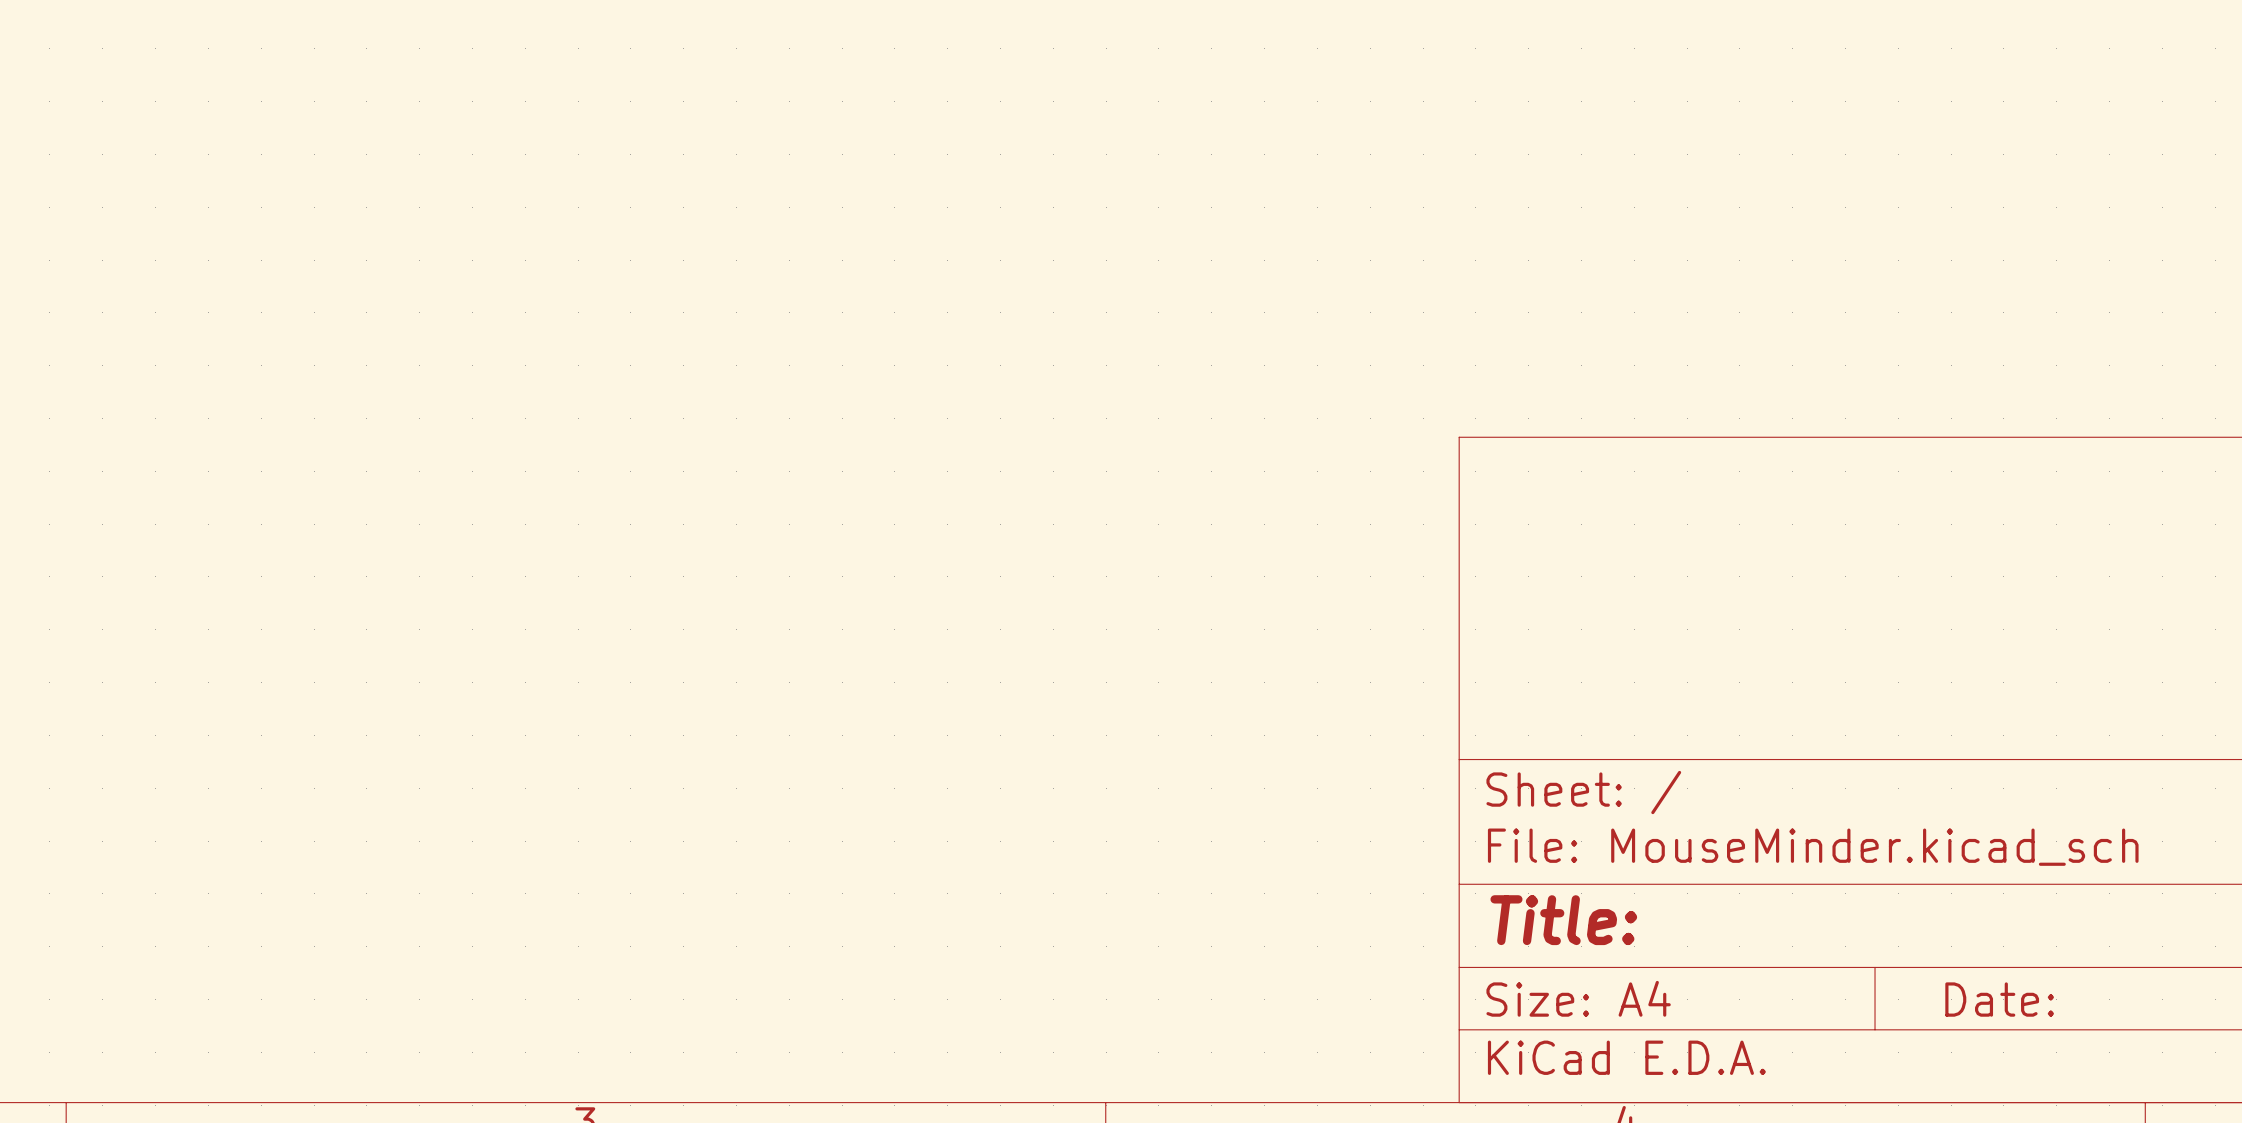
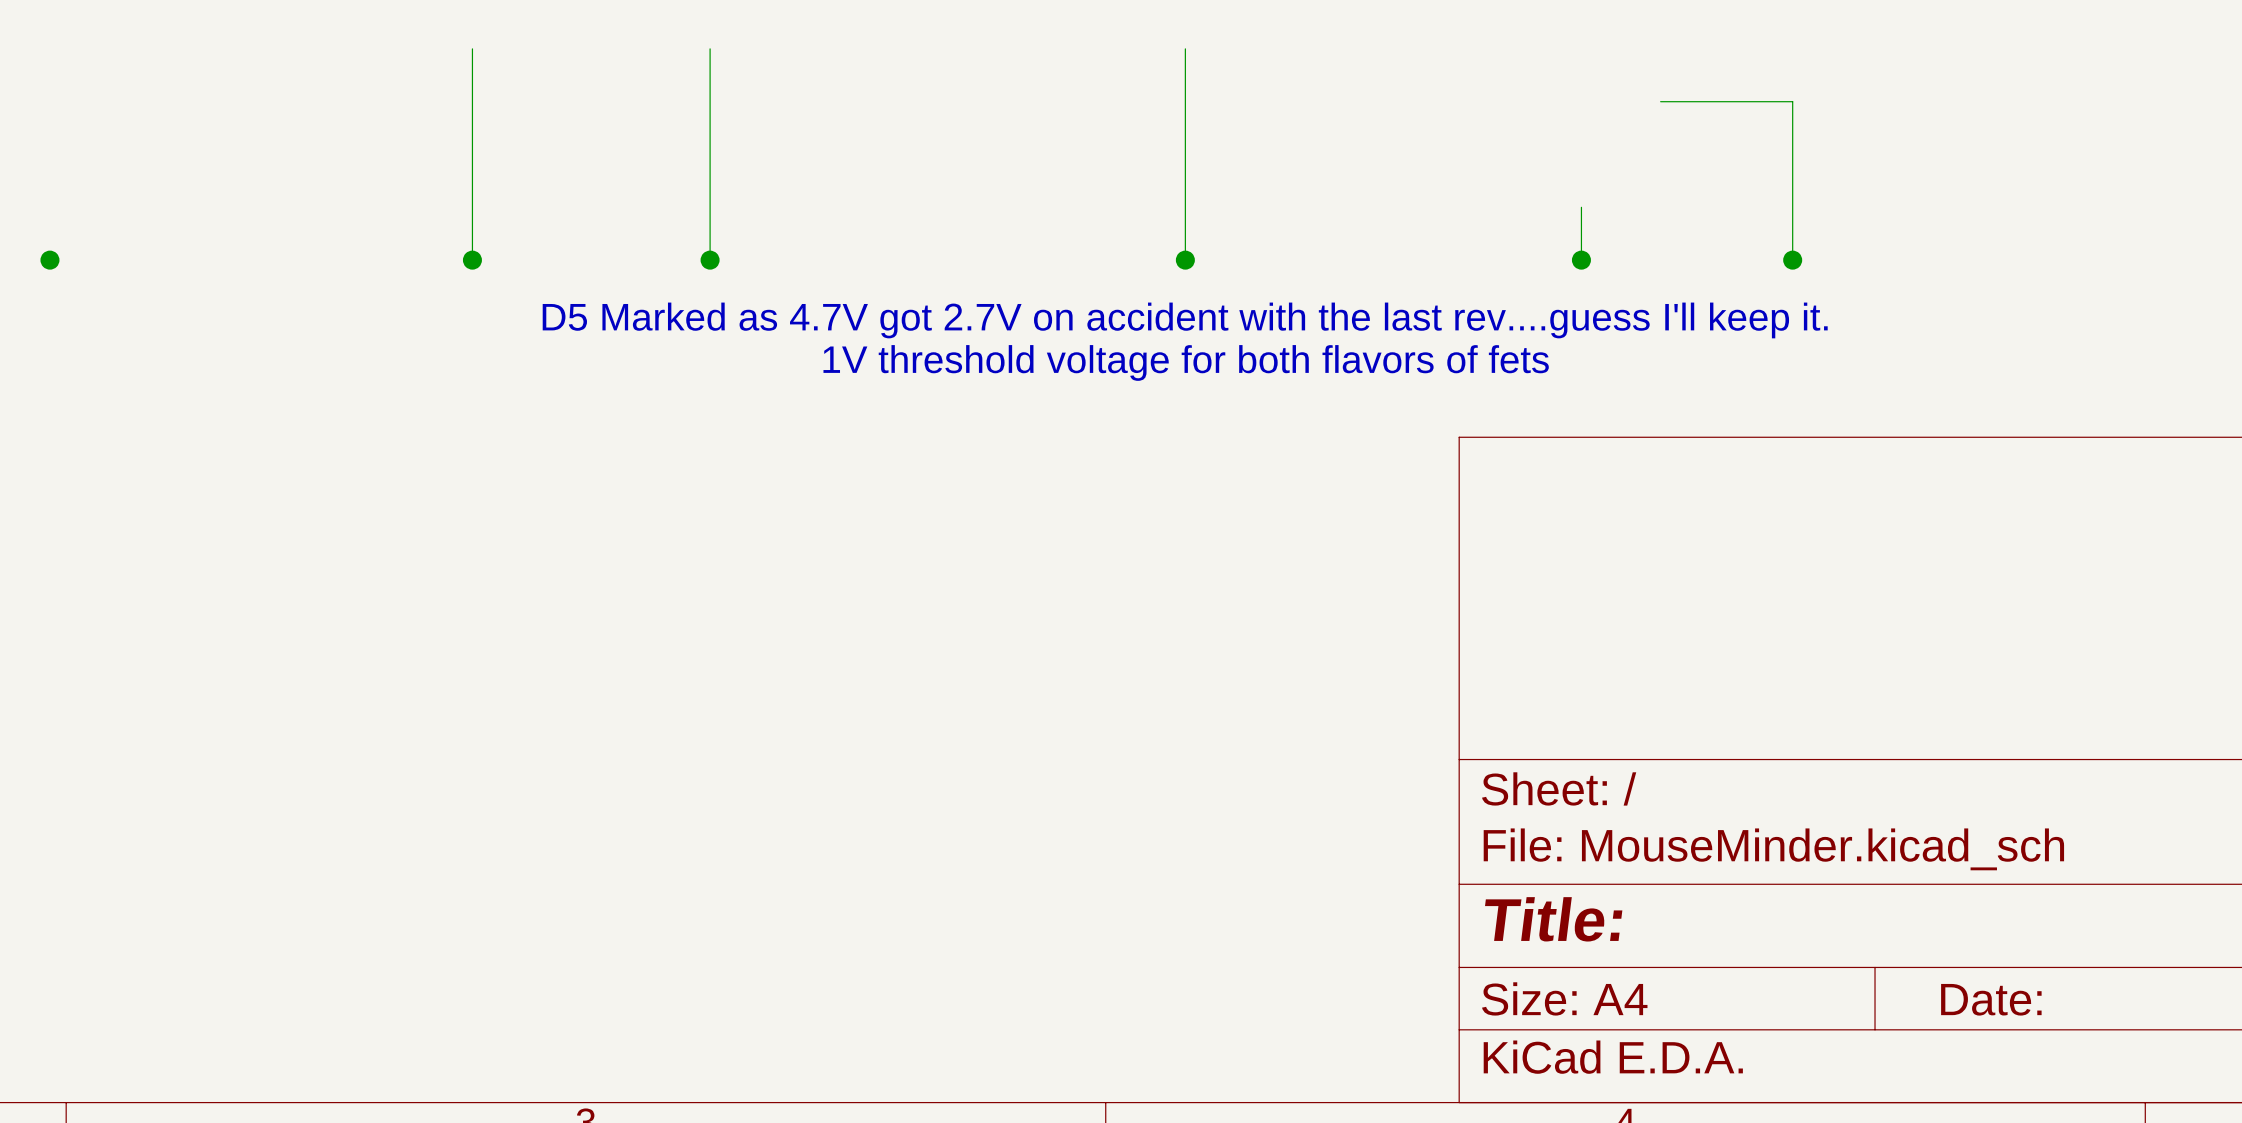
wire: none -> (472, 48) (472, 260)
wire: none -> (710, 48) (710, 260)
wire: none -> (1185, 48) (1185, 260)
wire: none -> (1660, 101) (1792, 101) (1792, 260)
wire: none -> (1581, 207) (1581, 260)
junction: none -> (49, 260)
junction: none -> (472, 260)
junction: none -> (710, 260)
junction: none -> (1185, 260)
junction: none -> (1581, 260)
junction: none -> (1792, 260)
text: none -> D5 Marked as 4.7V got 2.7V on accident with the last rev....guess I'll keep it. (1185, 320)
text: none -> 1V threshold voltage for both flavors of fets (1186, 362)

